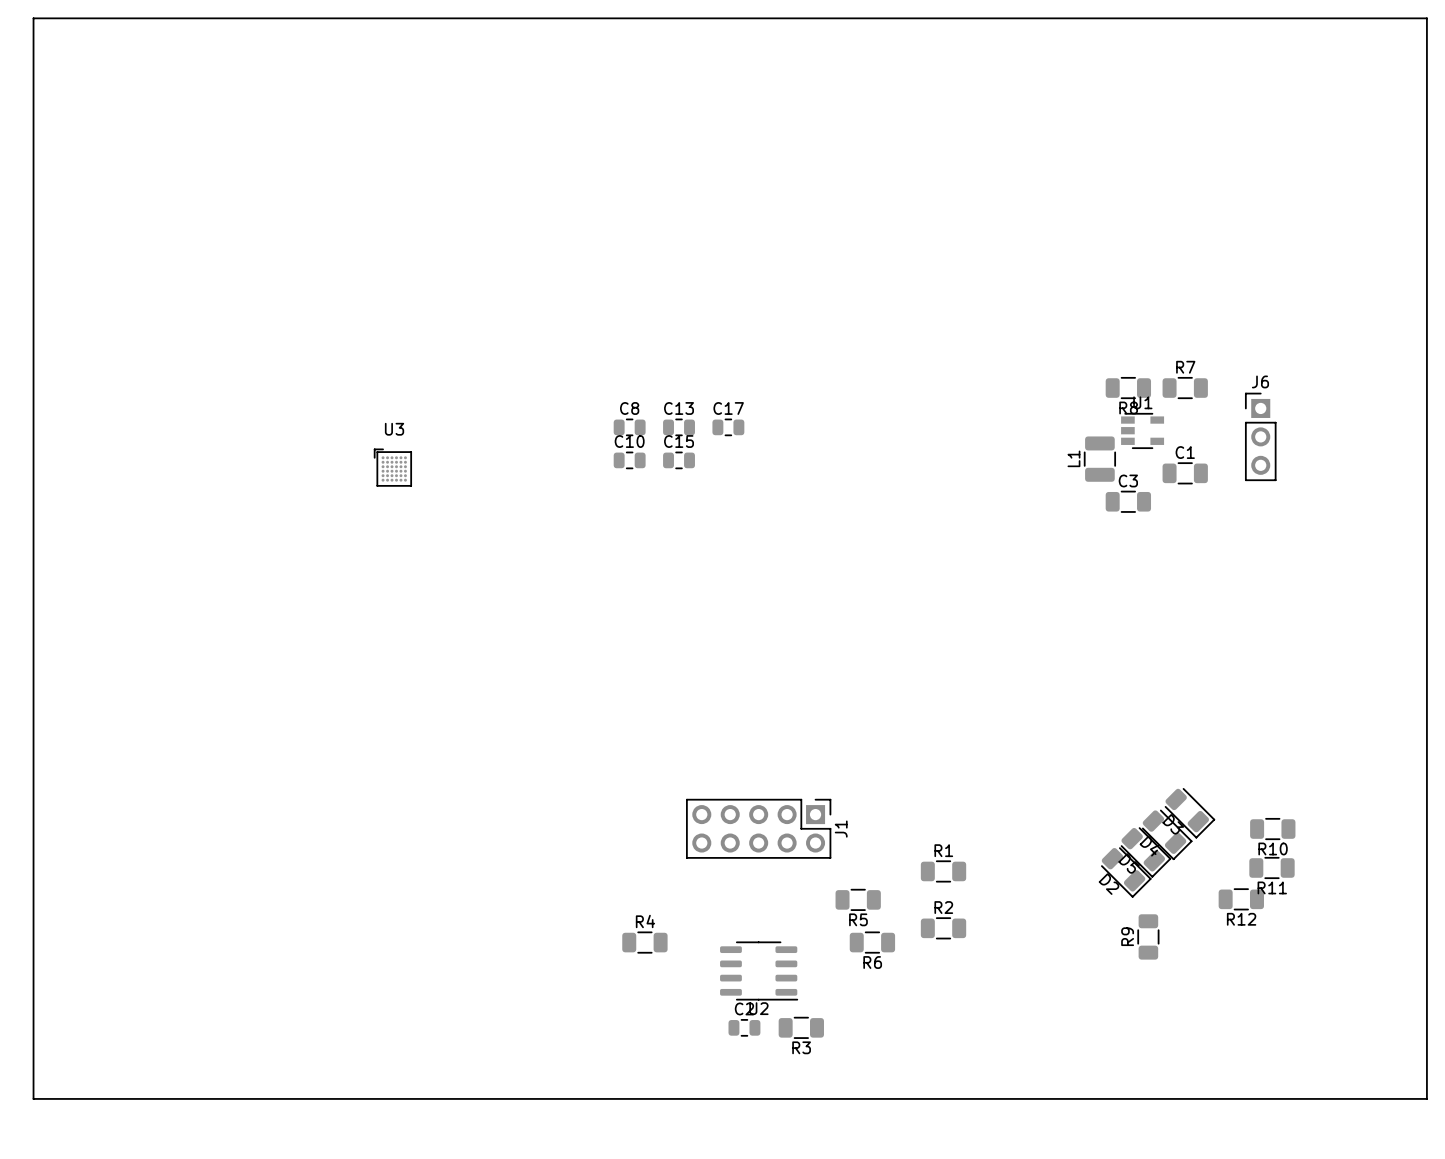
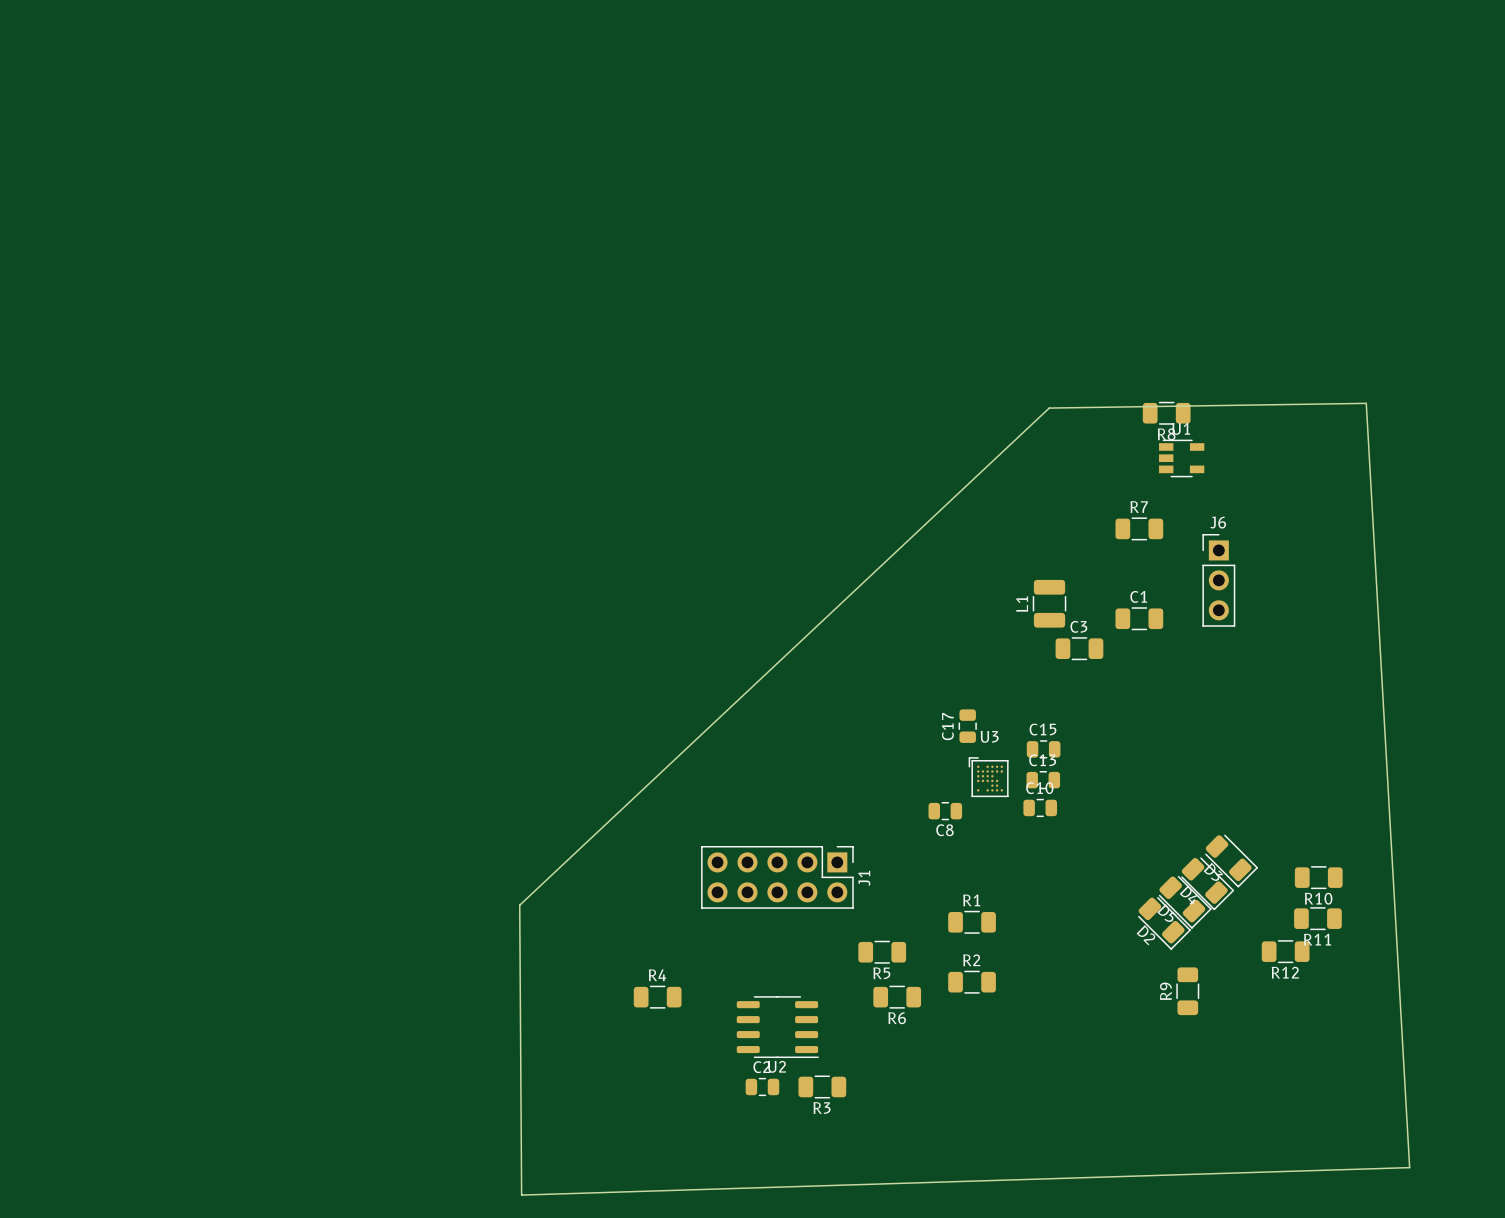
board edge: (33, 18) (1426, 18) (1426, 1098) (33, 1098) (33, 18) -> none
board edge: none -> (1366, 403) (1409, 1167) (521, 1195) (519, 905) (1049, 408) (1366, 403)
R7 position: (1185, 388) -> (1139, 528)
C8 name position: C8 (629, 408) -> C8 (944, 830)
C17 name position: C17 (728, 408) -> C17 (947, 726)
C8 position: (629, 427) -> (945, 811)
C13 position: (679, 427) -> (1043, 780)
C17 rotation: 0° (728, 427) -> 90° clockwise (967, 726)
C17 position: (728, 427) -> (967, 726)
J6 position: (1260, 436) -> (1218, 580)
U3 footprint: [374, 448, 412, 487] -> [968, 757, 1009, 797]
L1 position: (1099, 459) -> (1049, 603)
C10 position: (629, 460) -> (1040, 807)
C15 position: (679, 460) -> (1043, 749)
C1 position: (1185, 473) -> (1139, 618)
C3 position: (1128, 501) -> (1079, 648)

